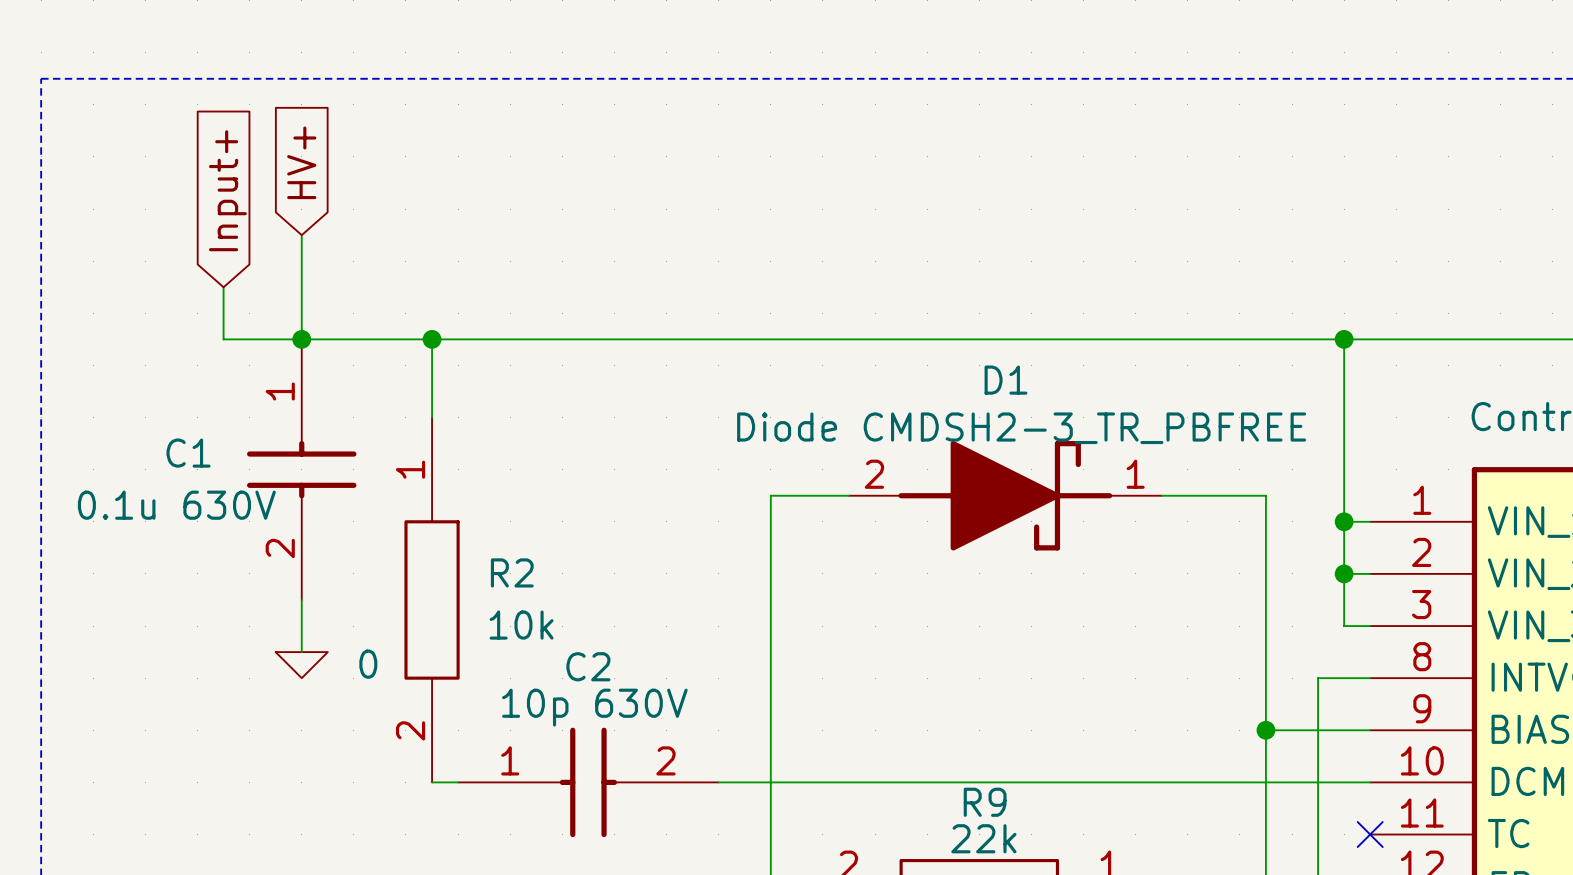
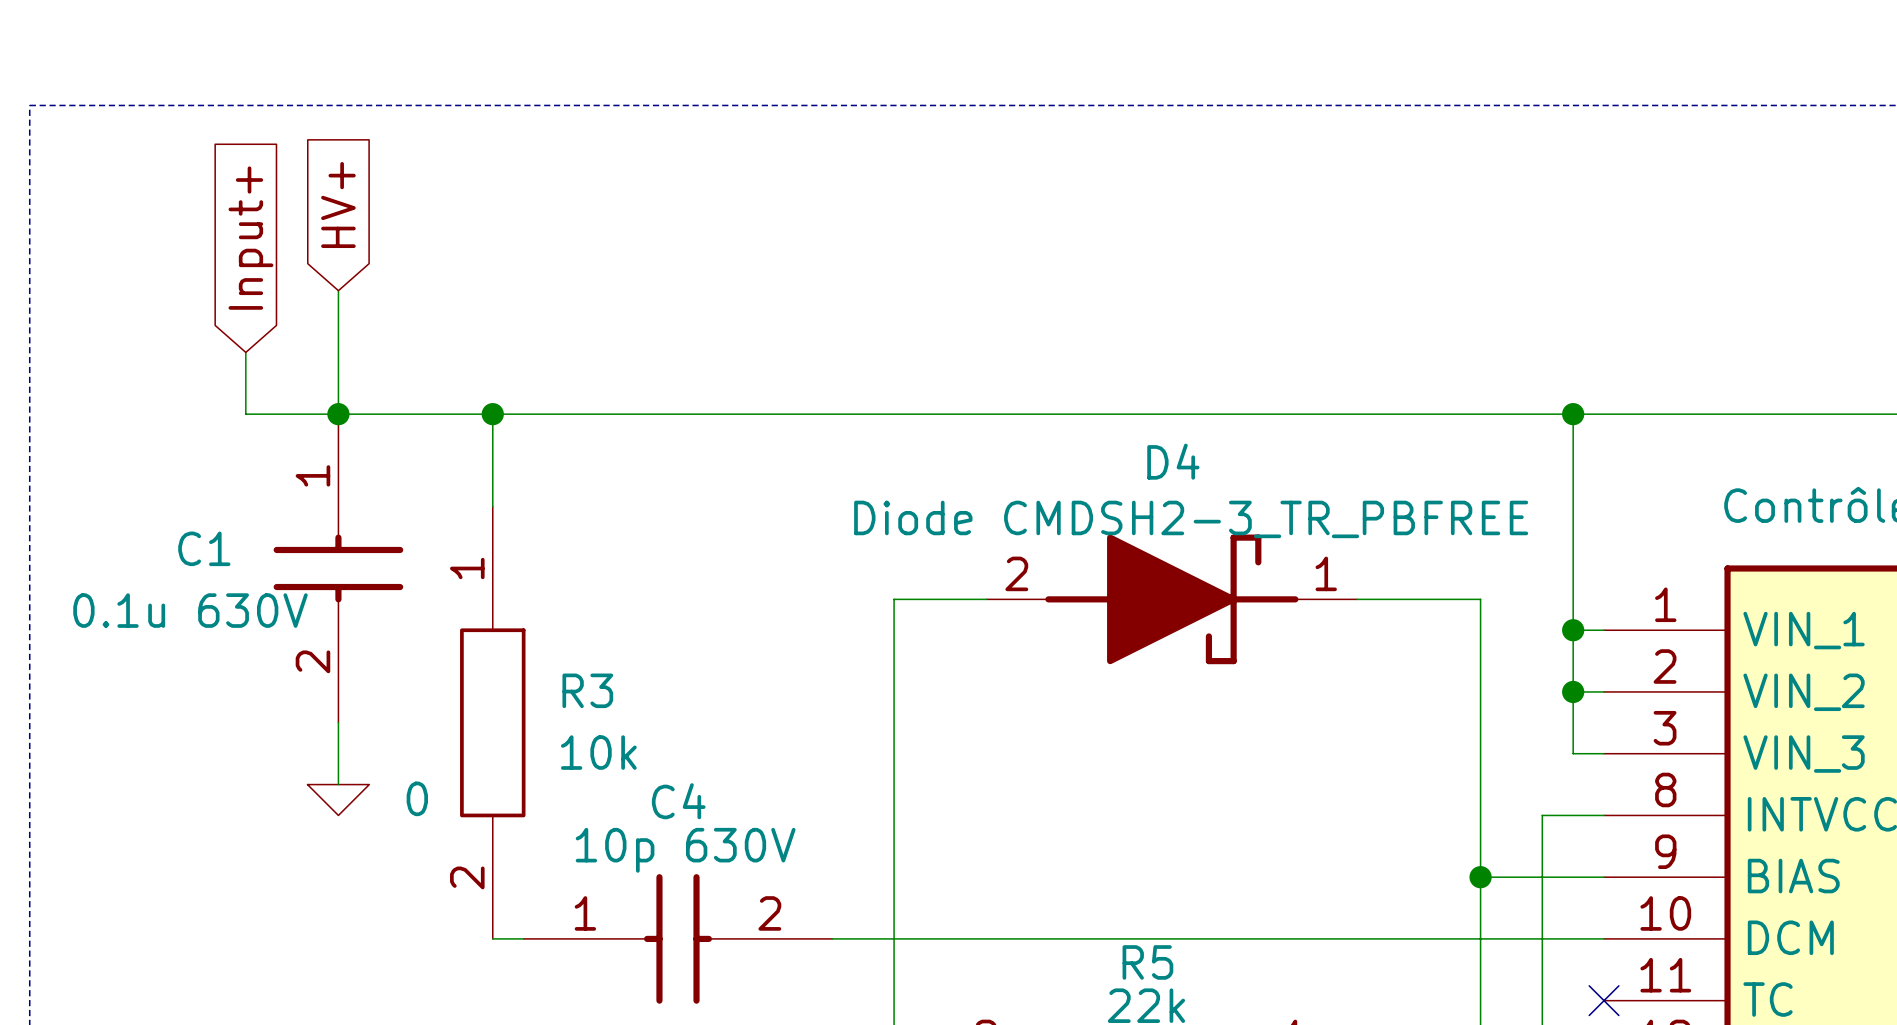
D1 name: D1 (1005, 380) -> D4 (1173, 461)
R2 name: R2 (512, 572) -> R3 (587, 690)
C2 name: C2 (588, 666) -> C4 (678, 801)
R9 name: R9 (985, 802) -> R5 (1147, 962)

